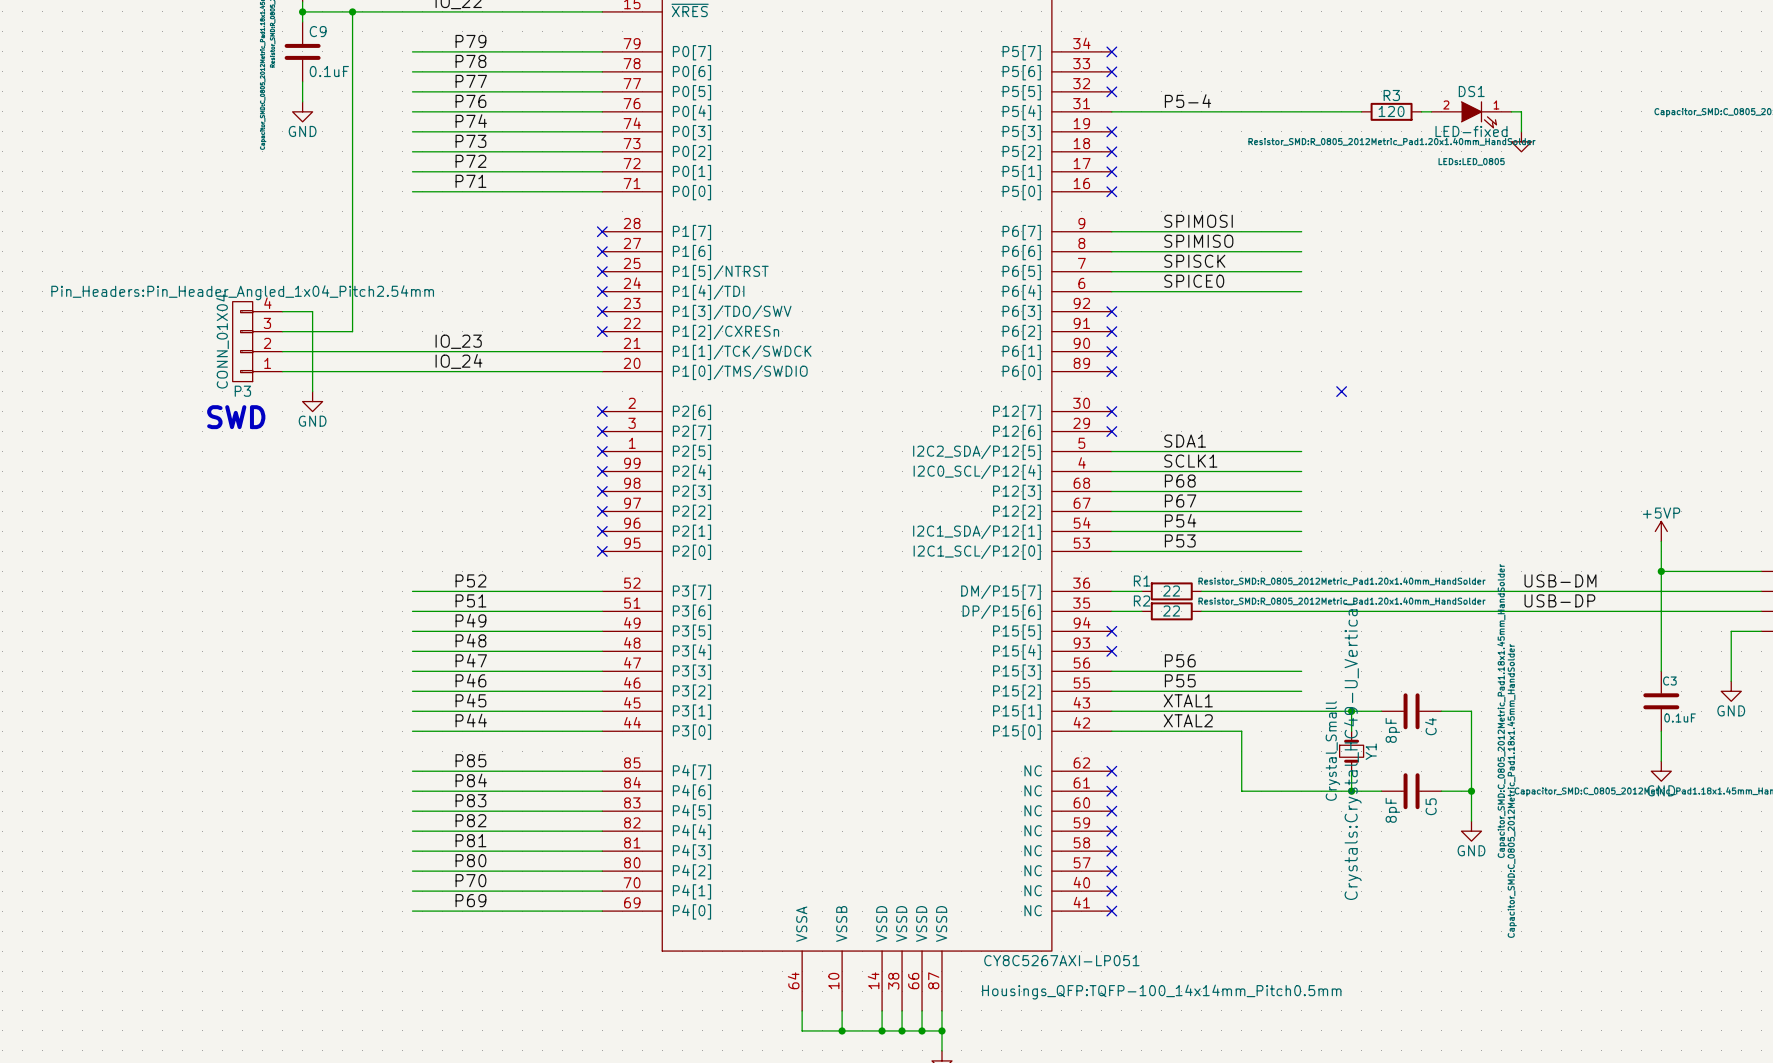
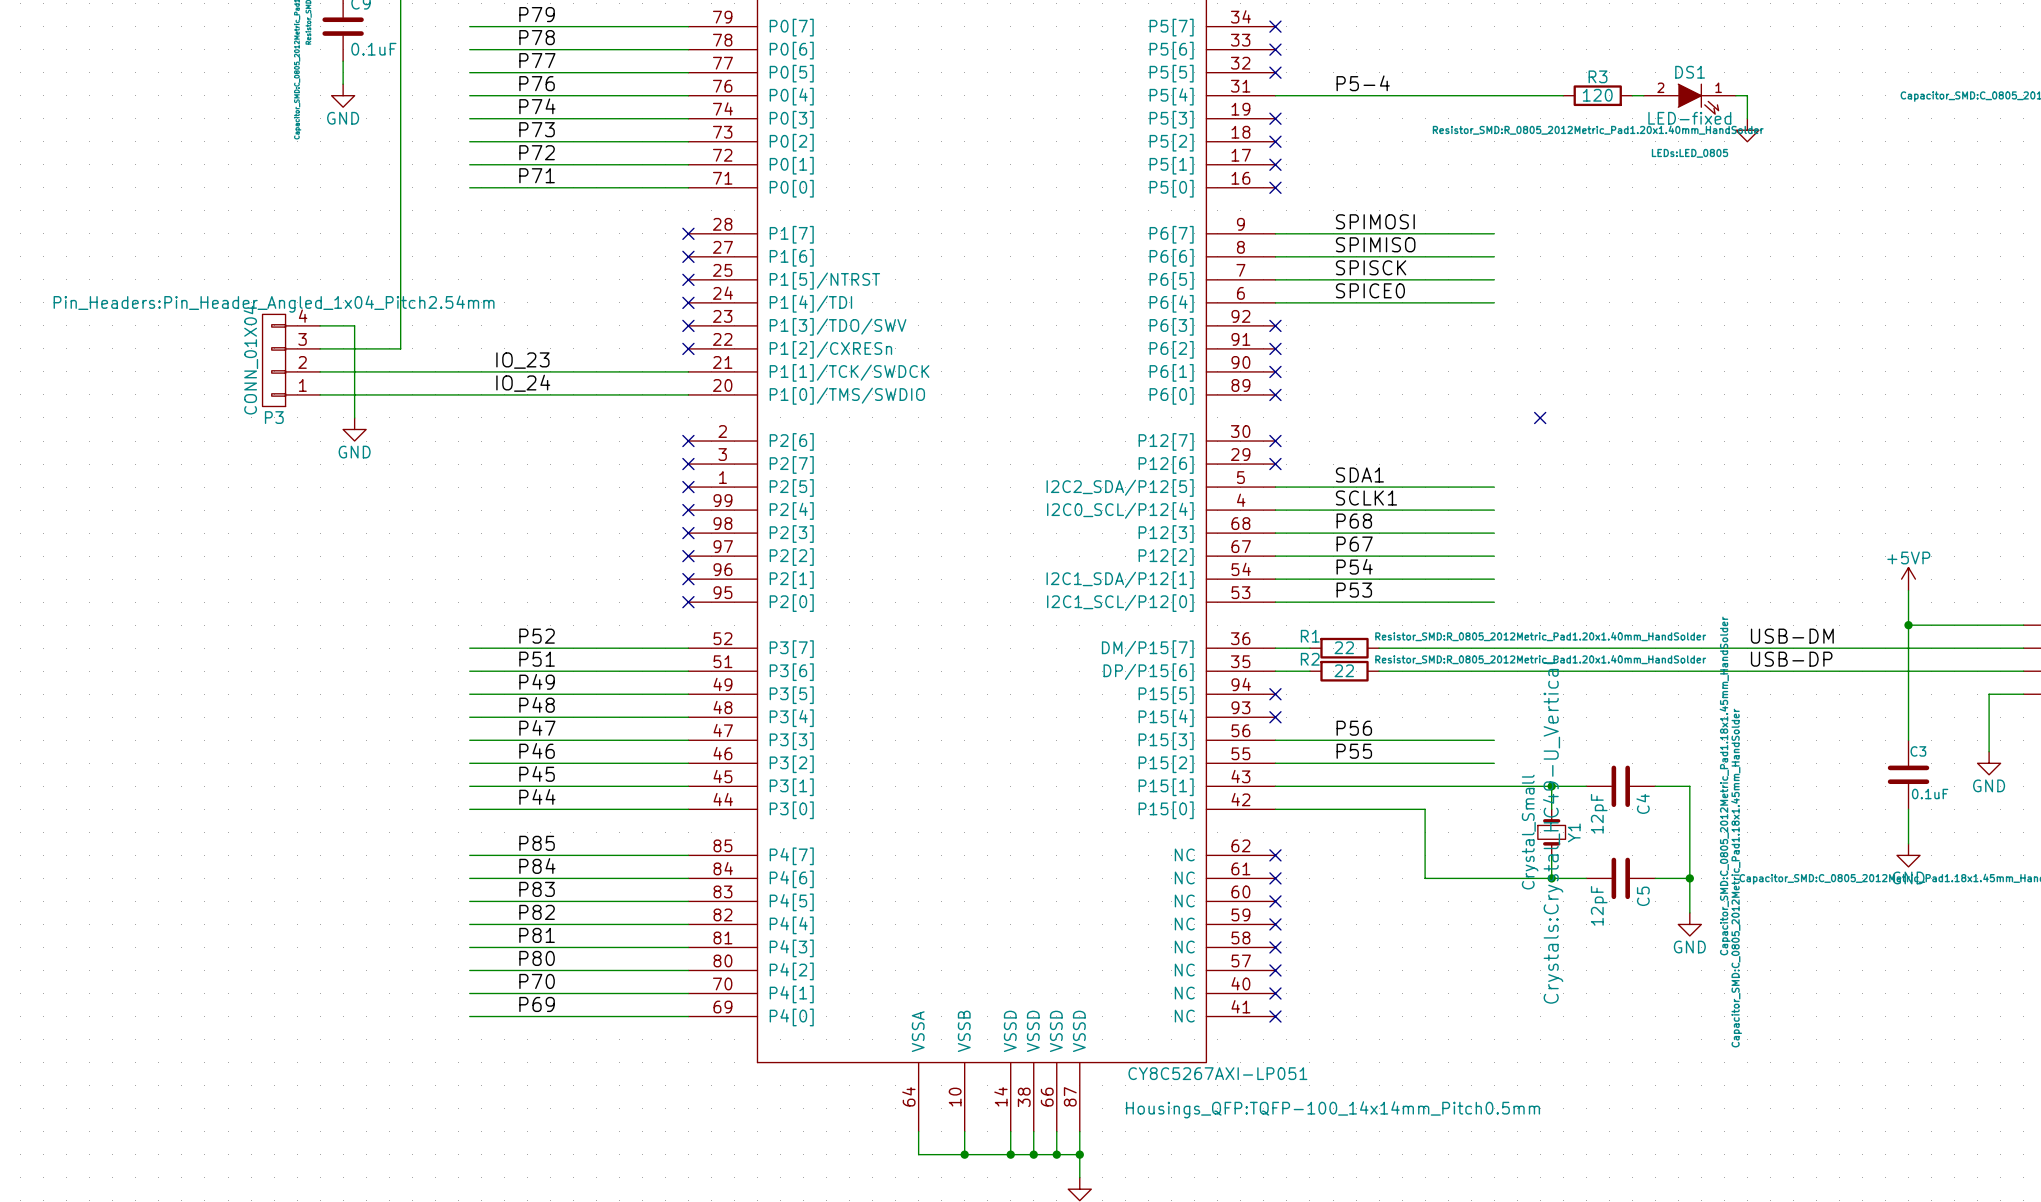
text: SWD (236, 417) -> none
label: XTAL1 (1188, 700) -> none
label: XTAL2 (1188, 720) -> none
C4 value: 8pF (1392, 730) -> 12pF (1599, 813)
C5 value: 8pF (1392, 810) -> 12pF (1599, 905)

